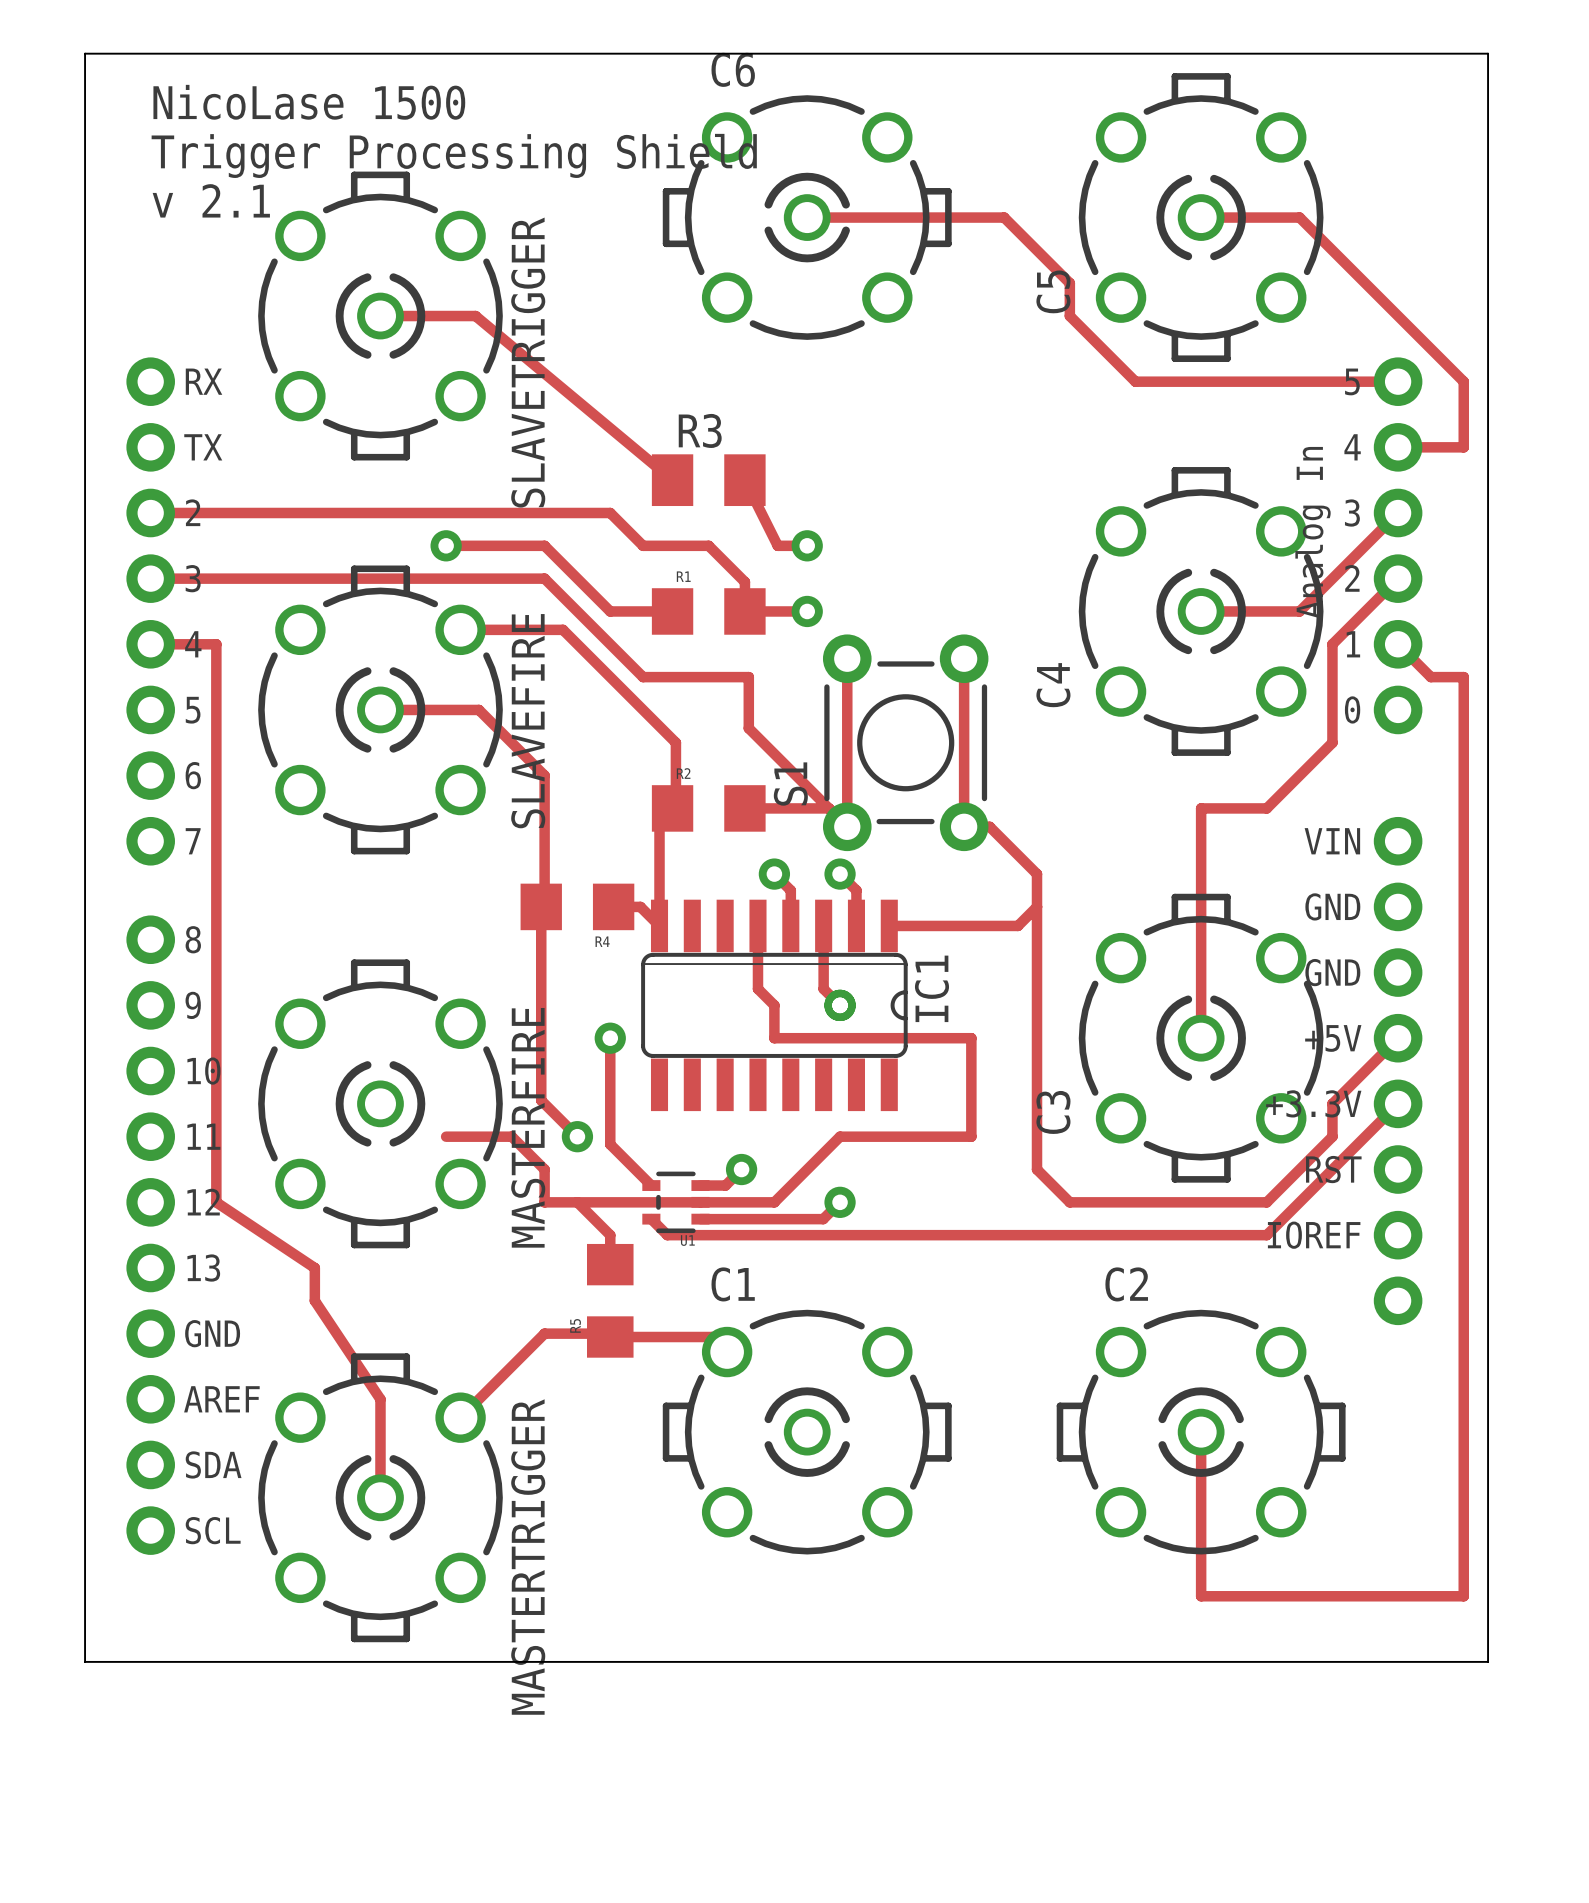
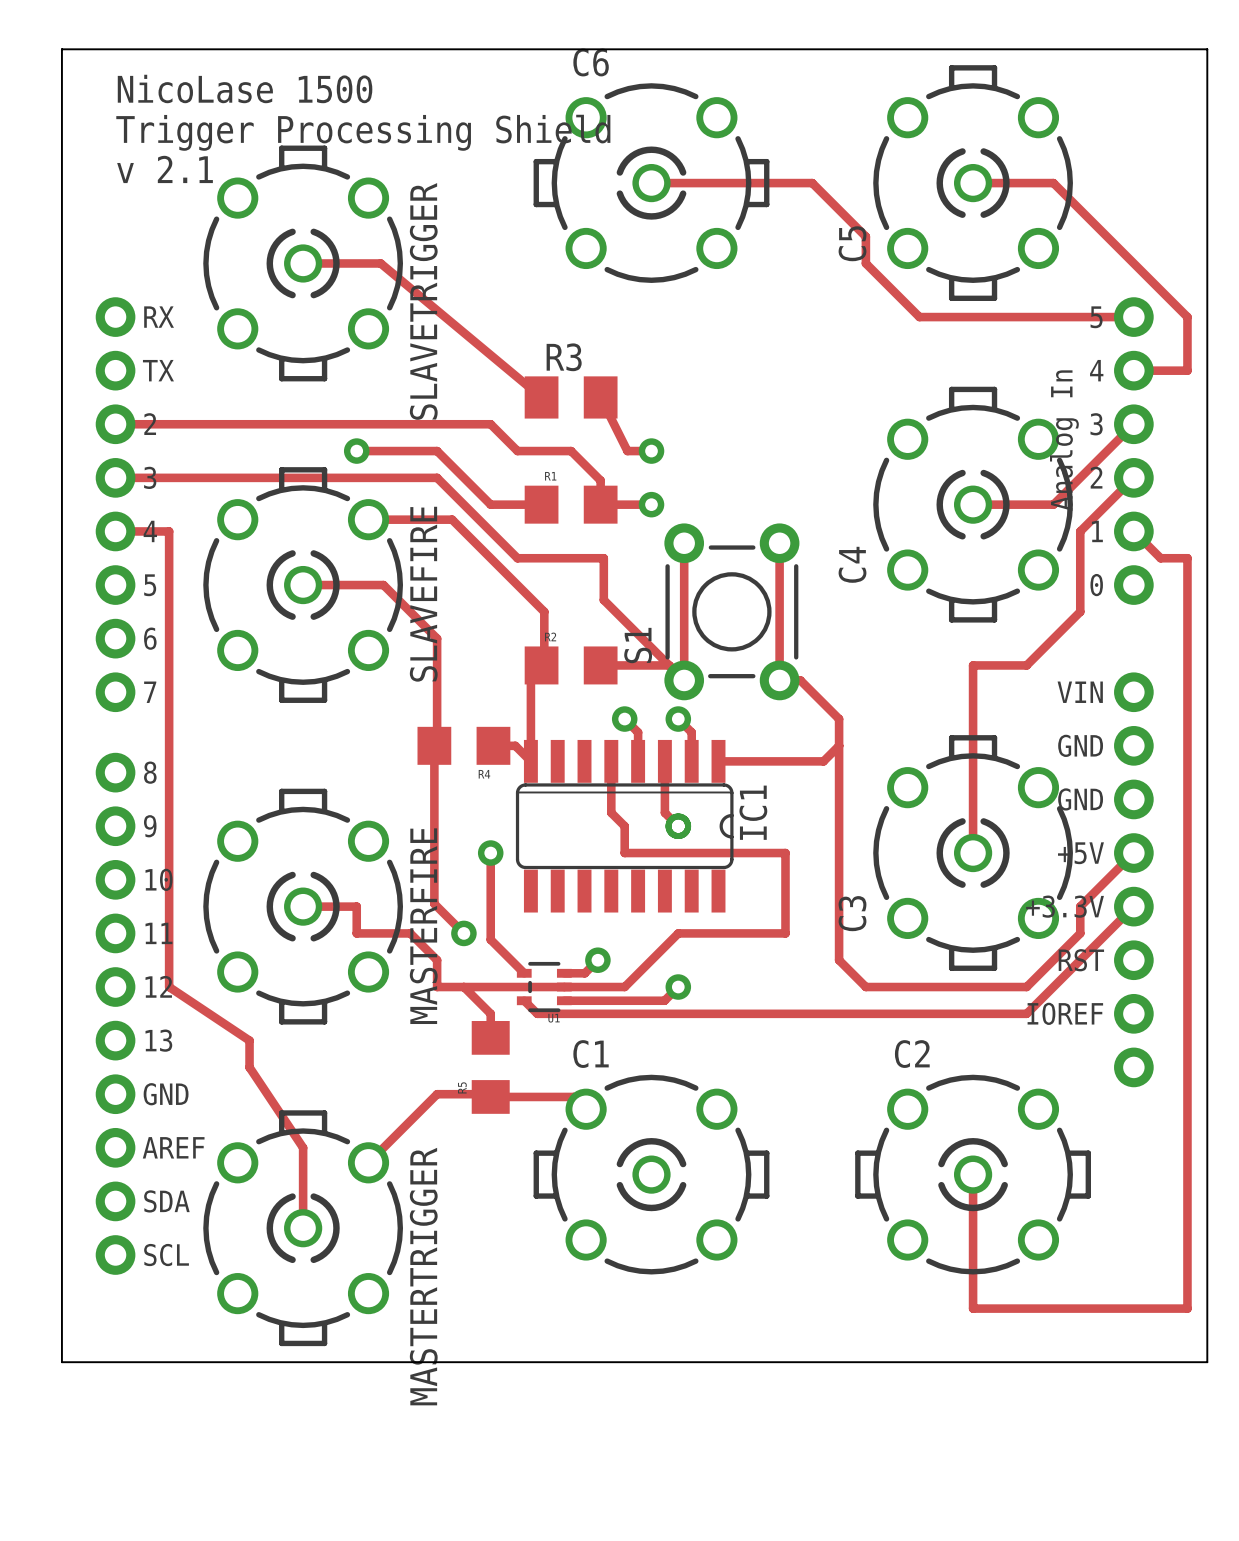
track: none -> (303, 906) (356, 906) (356, 933)

